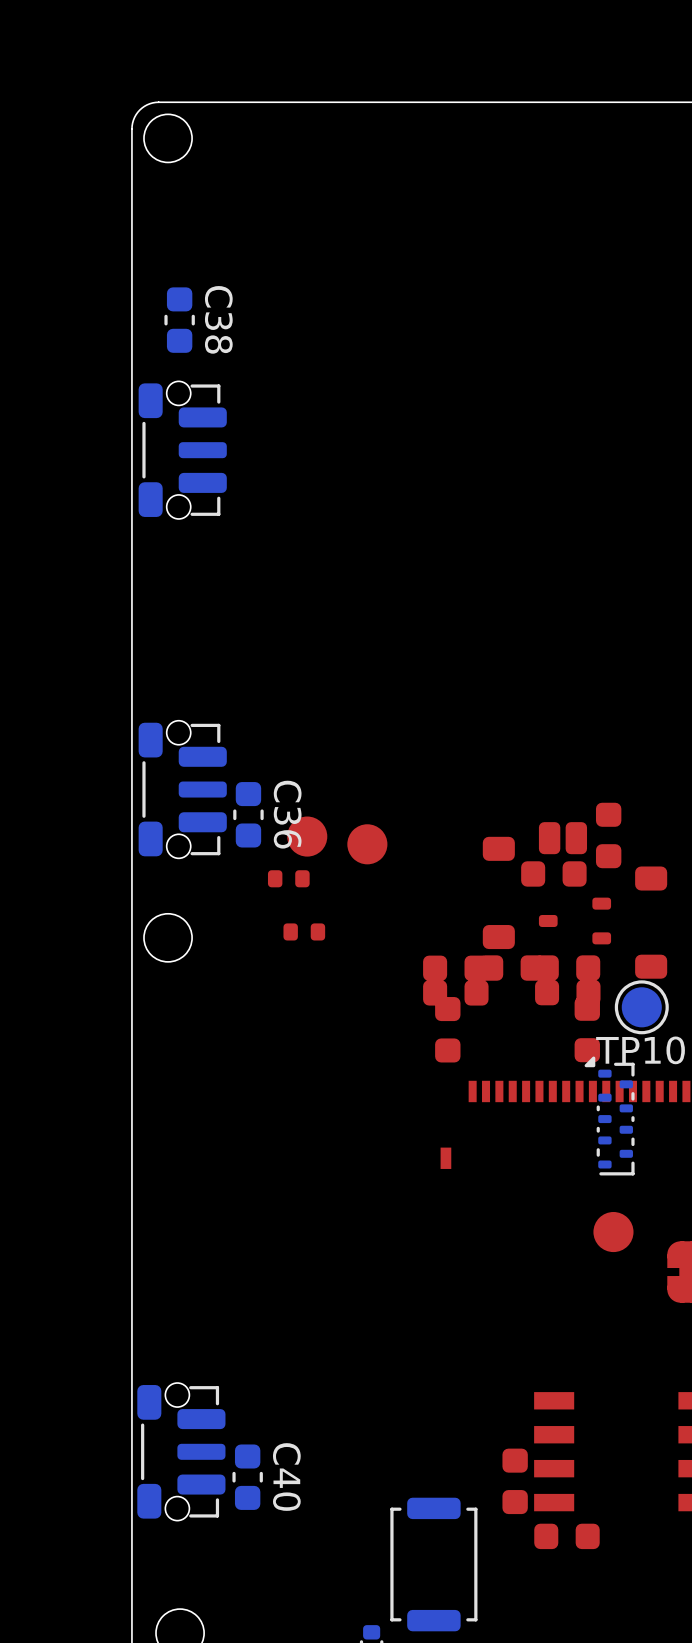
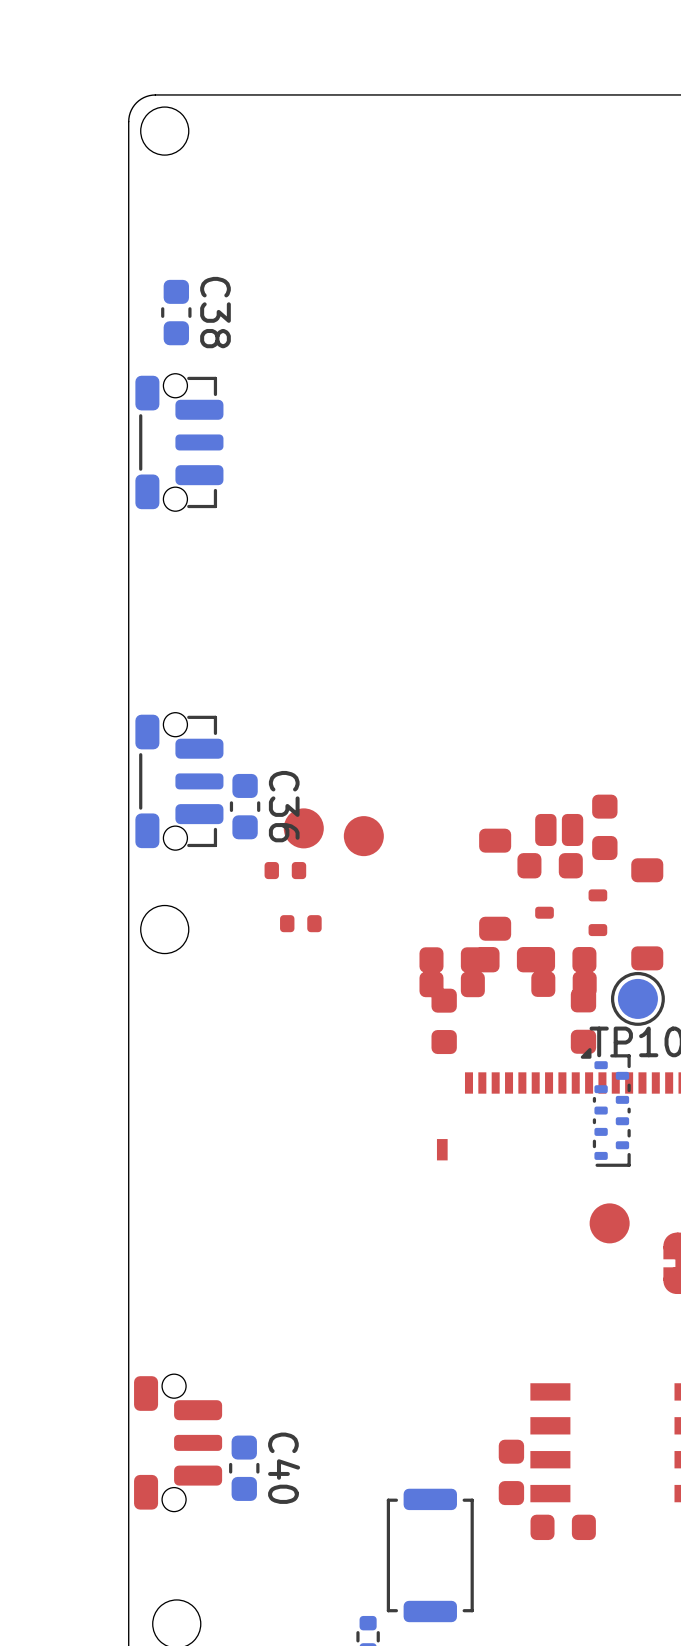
part side: bottom (181, 1451) -> top (178, 1442)

